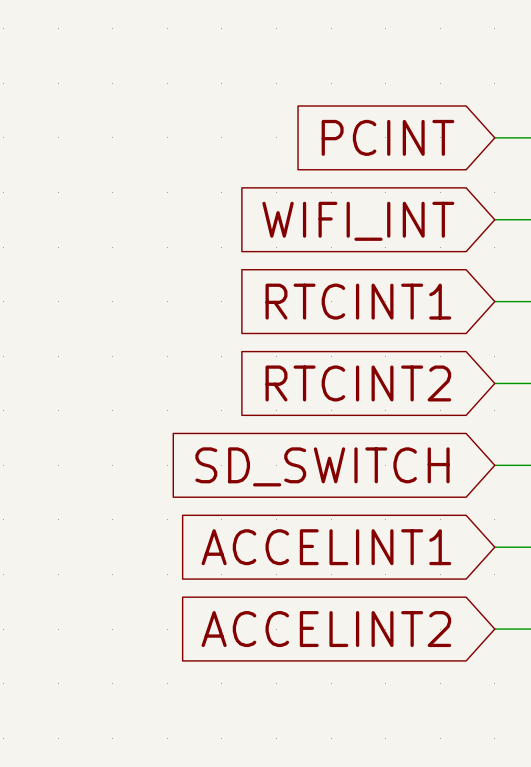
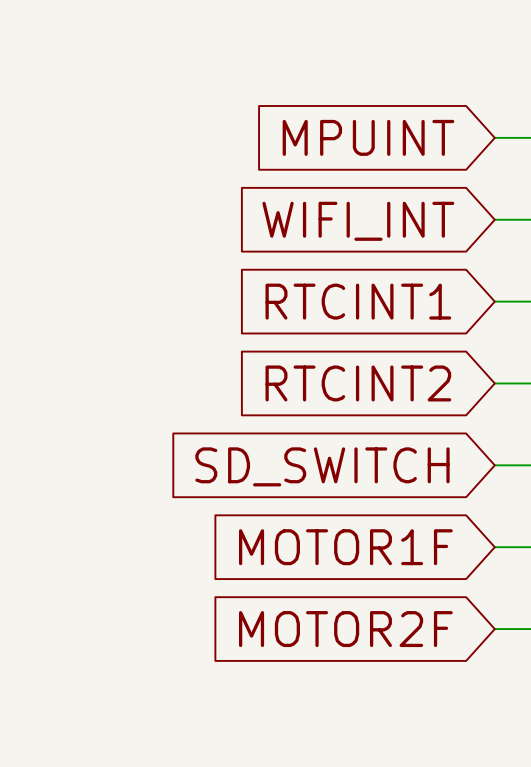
global label: PCINT (387, 137) -> MPUINT (368, 137)
global label: ACCELINT1 (326, 547) -> MOTOR1F (345, 547)
global label: ACCELINT2 (326, 629) -> MOTOR2F (345, 629)

